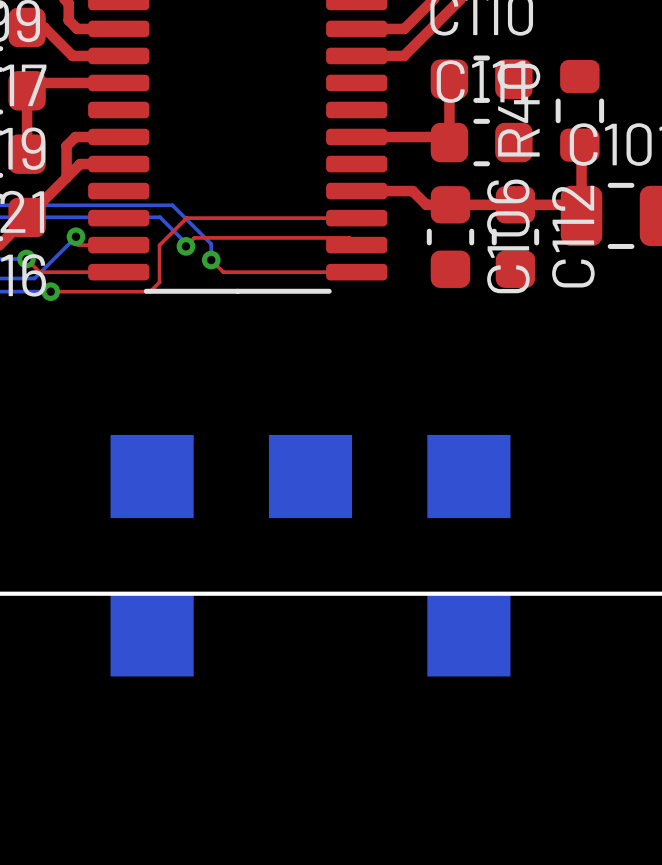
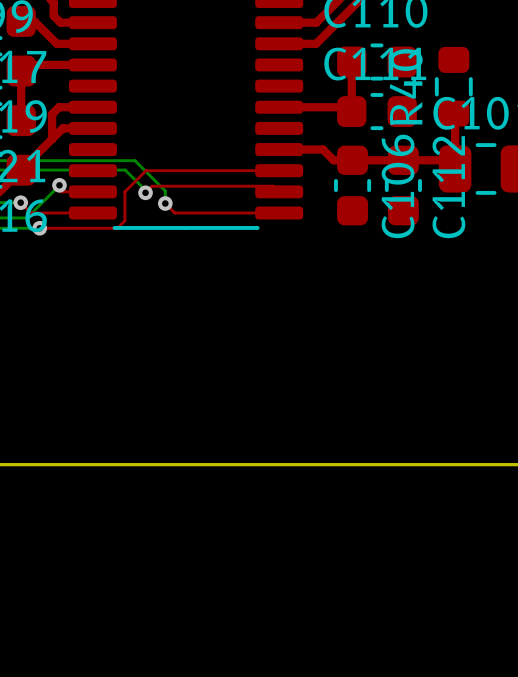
part: (152, 476) -> none
part: (310, 476) -> none
part: (468, 476) -> none
part: (152, 634) -> none
part: (468, 634) -> none

